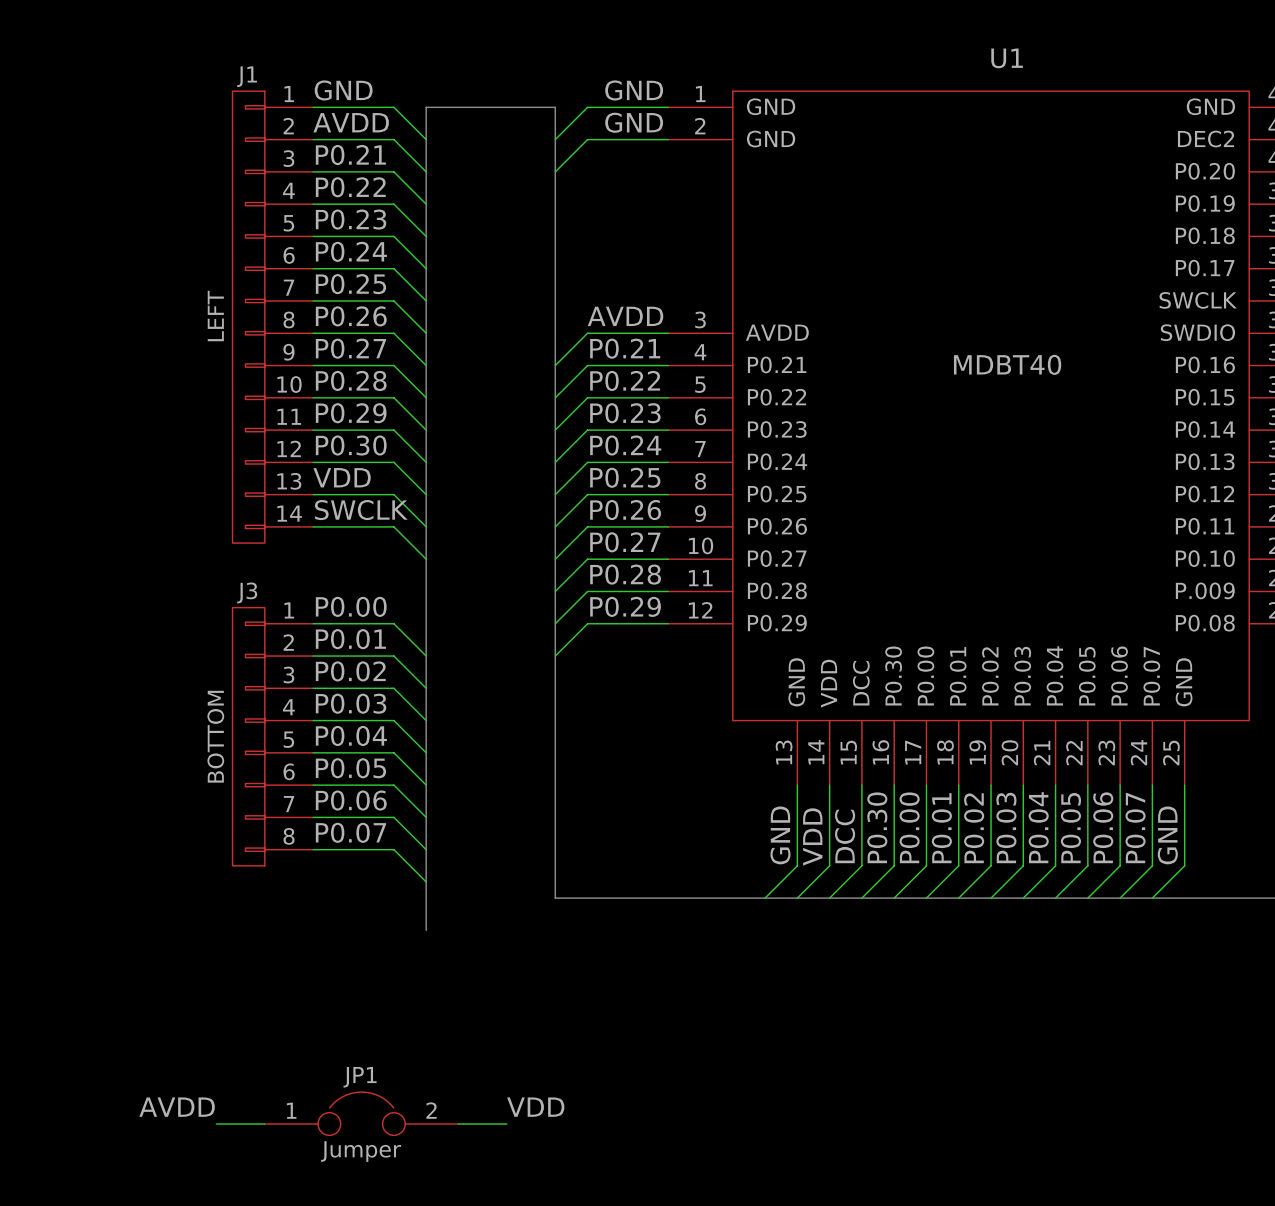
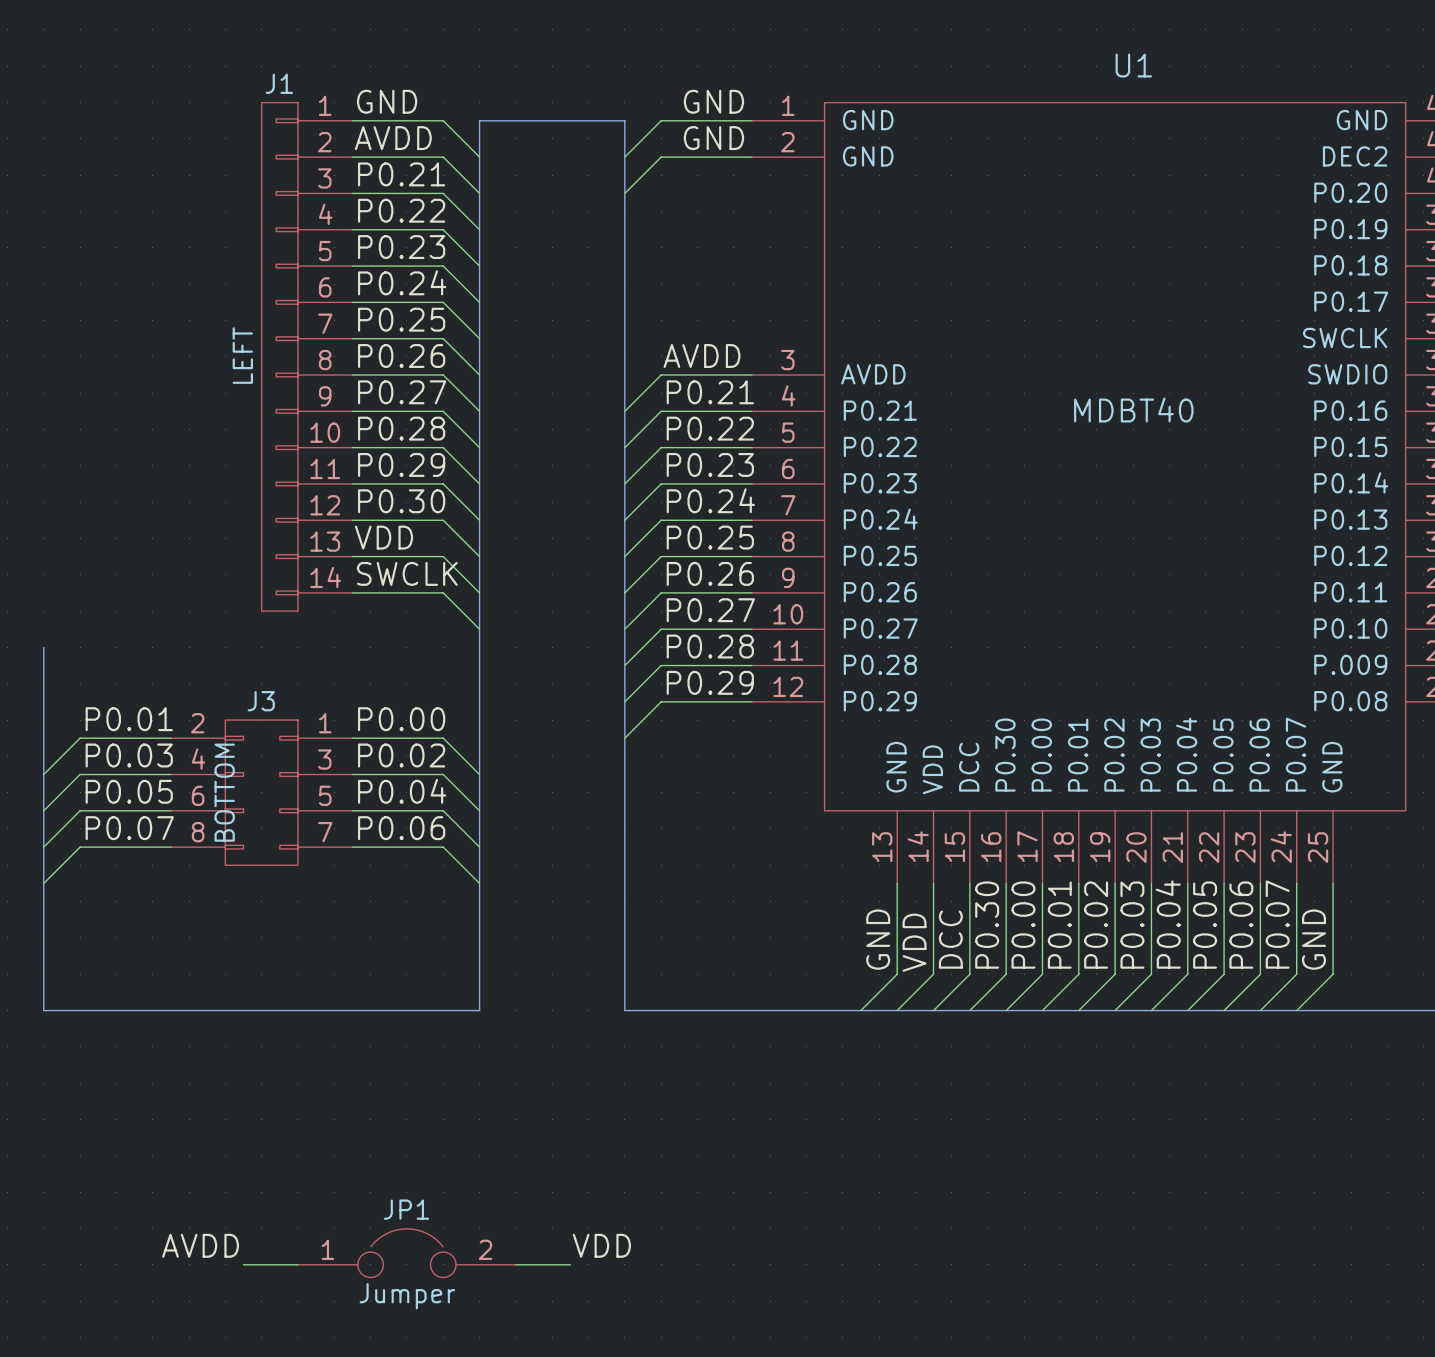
J3 name position: J3 (247, 592) -> J3 (261, 701)
label: P0.00 (351, 606) -> none
J3 symbol: [232, 607, 314, 866] -> [170, 720, 353, 866]
wire: (313, 623) (393, 623) (426, 656) -> none
label: none -> P0.01 (129, 719)
label: P0.01 (350, 639) -> P0.00 (401, 719)
wire: none -> (170, 738) (80, 738) (43, 774)
label: none -> P0.03 (129, 755)
wire: none -> (170, 774) (80, 774) (43, 810)
label: P0.03 (351, 703) -> P0.04 (402, 791)
wire: none -> (170, 810) (80, 810) (43, 847)
label: P0.04 (351, 735) -> P0.06 (401, 828)
wire: none -> (170, 847) (80, 847) (43, 883)
label position: P0.05 (350, 768) -> P0.05 (129, 791)
wire: (313, 785) (393, 785) (426, 817) -> none
label: P0.06 (351, 800) -> none
wire: (313, 817) (393, 817) (426, 849) -> none
label position: P0.07 (350, 832) -> P0.07 (129, 828)
wire: (313, 849) (393, 849) (426, 881) -> none
bus: (426, 898) (426, 930) -> (479, 1010) (43, 1010) (43, 647)

